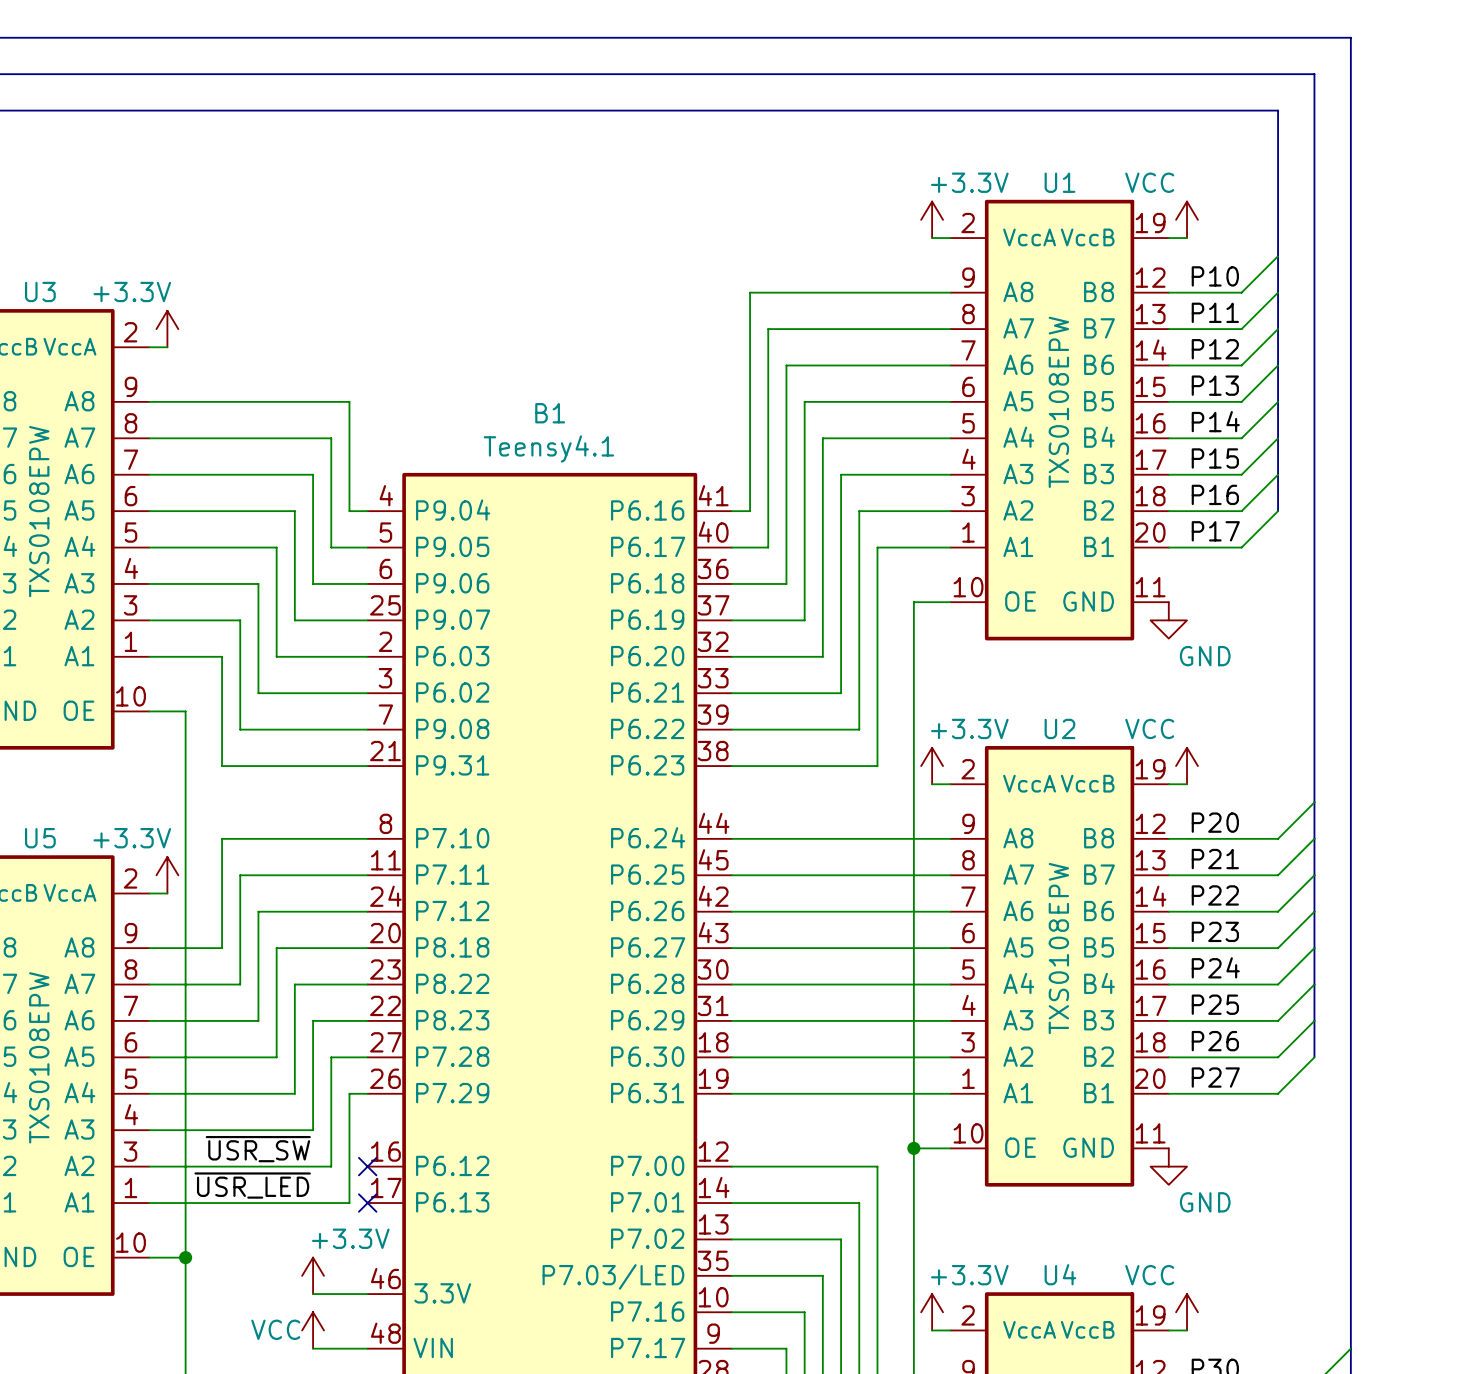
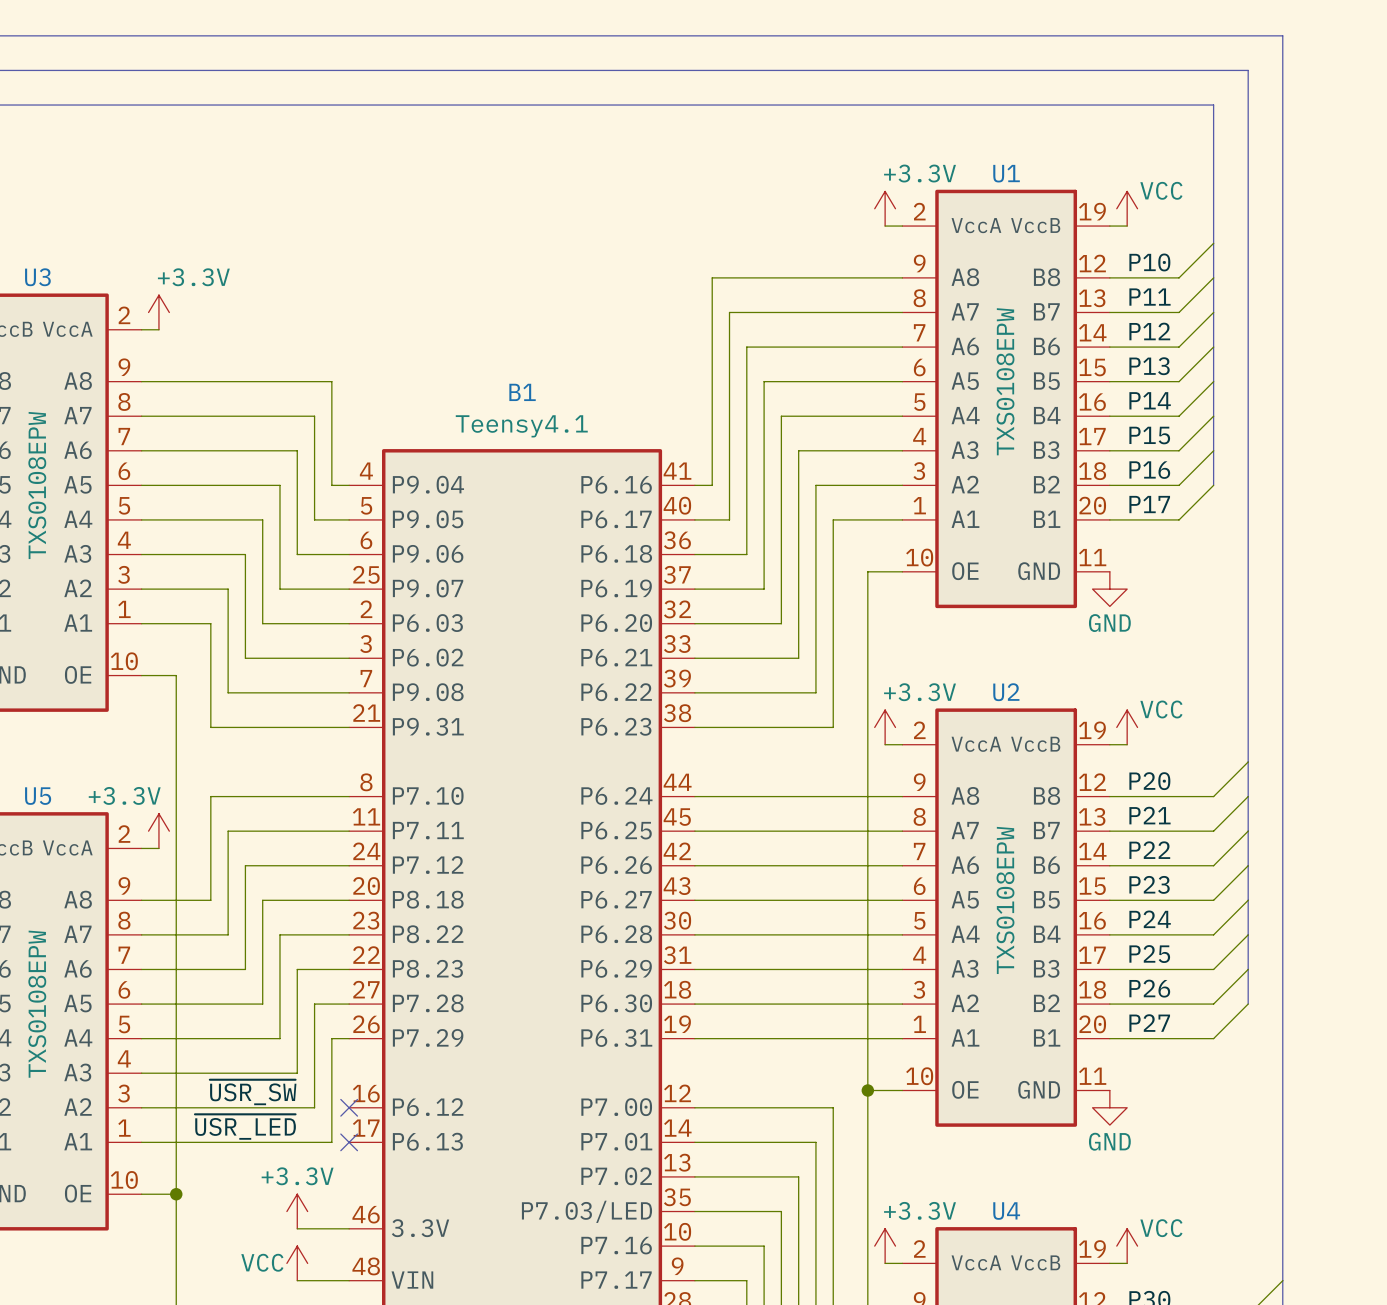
power symbol text position: VCC (1149, 182) -> VCC (1161, 190)
power symbol text position: +3.3V (132, 291) -> +3.3V (193, 277)
power symbol text position: GND (1205, 656) -> GND (1109, 623)
power symbol text position: VCC (1149, 728) -> VCC (1161, 709)
power symbol text position: GND (1205, 1202) -> GND (1109, 1141)
power symbol text position: +3.3V (350, 1238) -> +3.3V (297, 1176)
power symbol text position: VCC (1149, 1275) -> VCC (1161, 1228)

